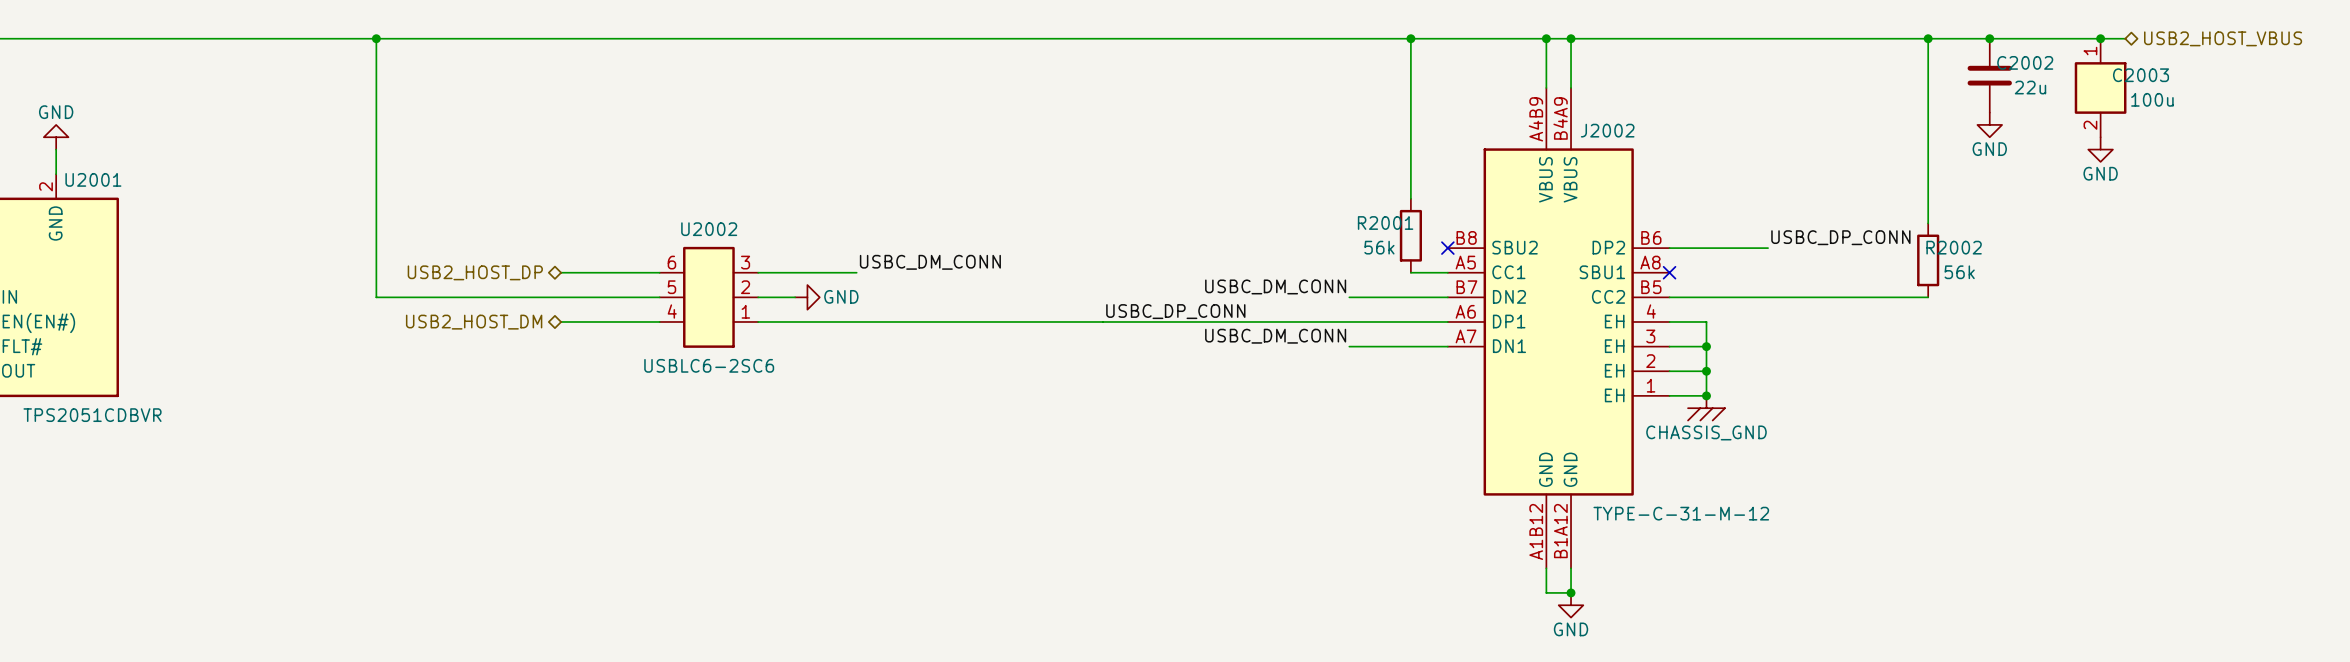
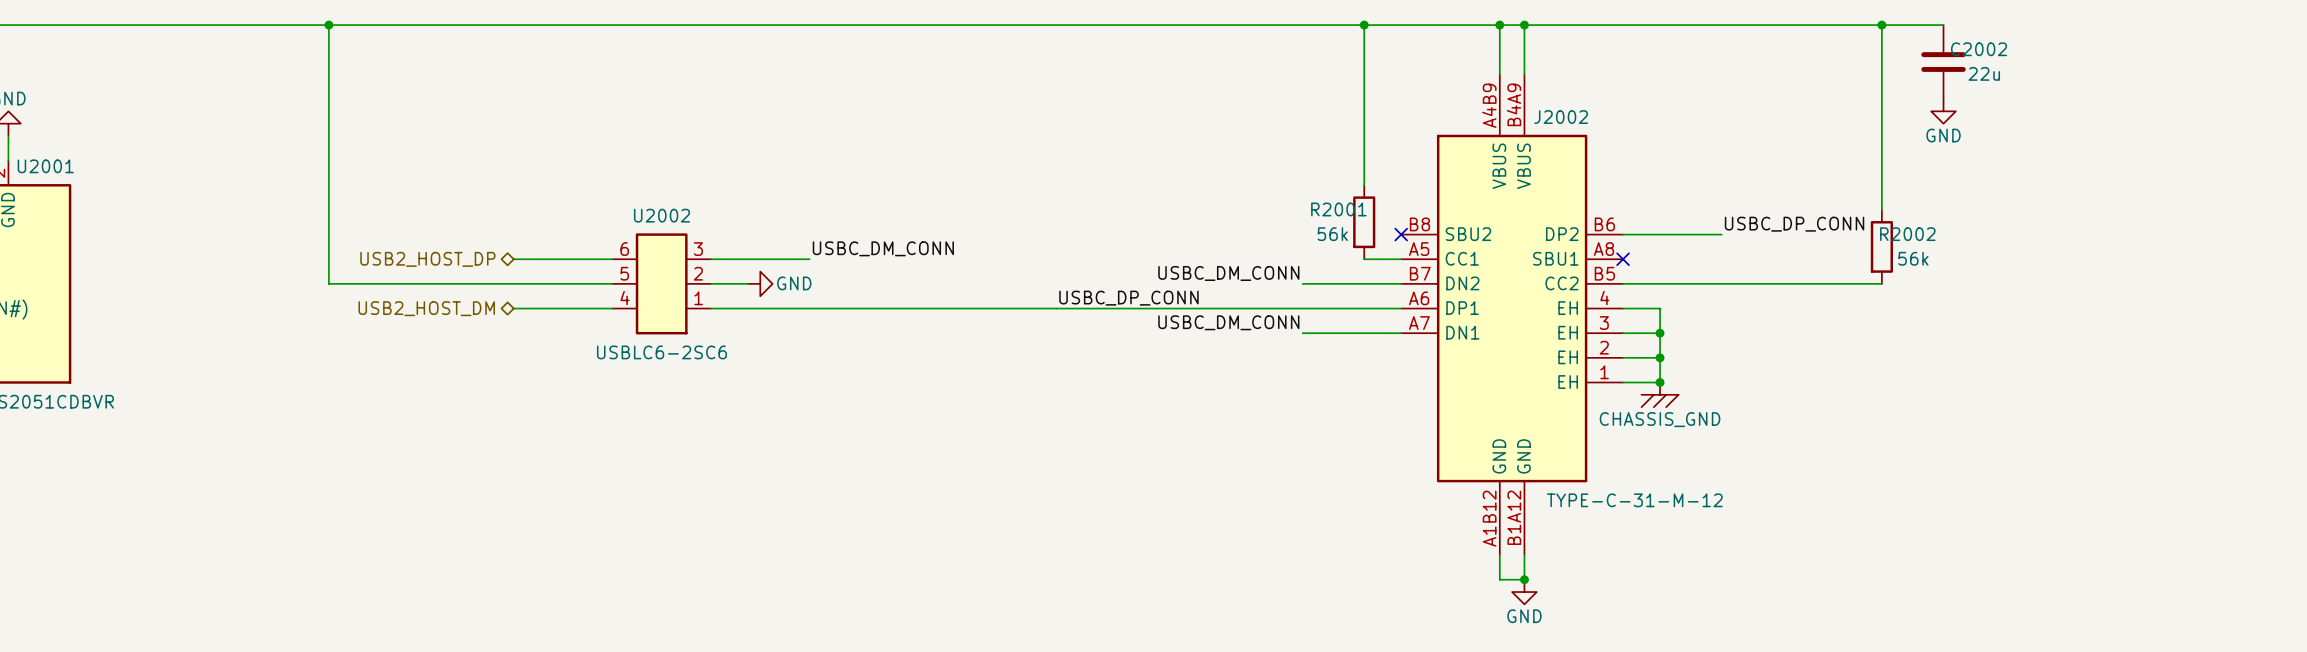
wire: (1989, 38) (2125, 38) -> none
junction: (1989, 38) -> none
junction: (2100, 38) -> none
hierarchical label: USB2_HOST_VBUS (2223, 38) -> none
C2003: 100u (2100, 87) -> none
power symbol: GND (2100, 149) -> none

